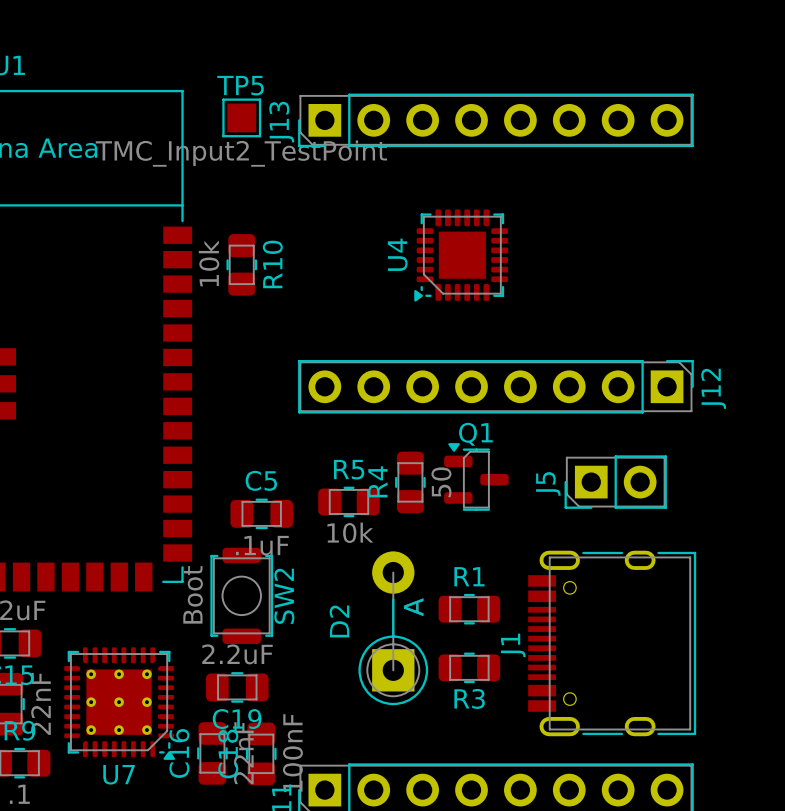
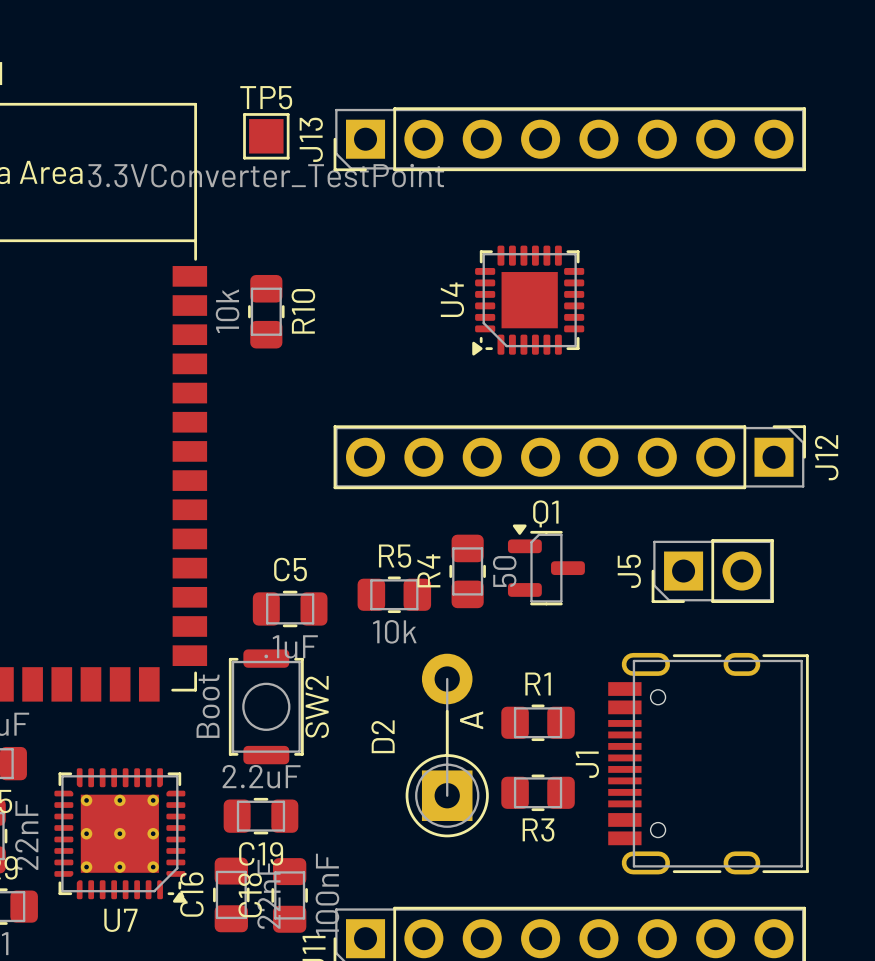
TP5 value: TMC_Input2_TestPoint (241, 153) -> 3.3VConverter_TestPoint (266, 175)

